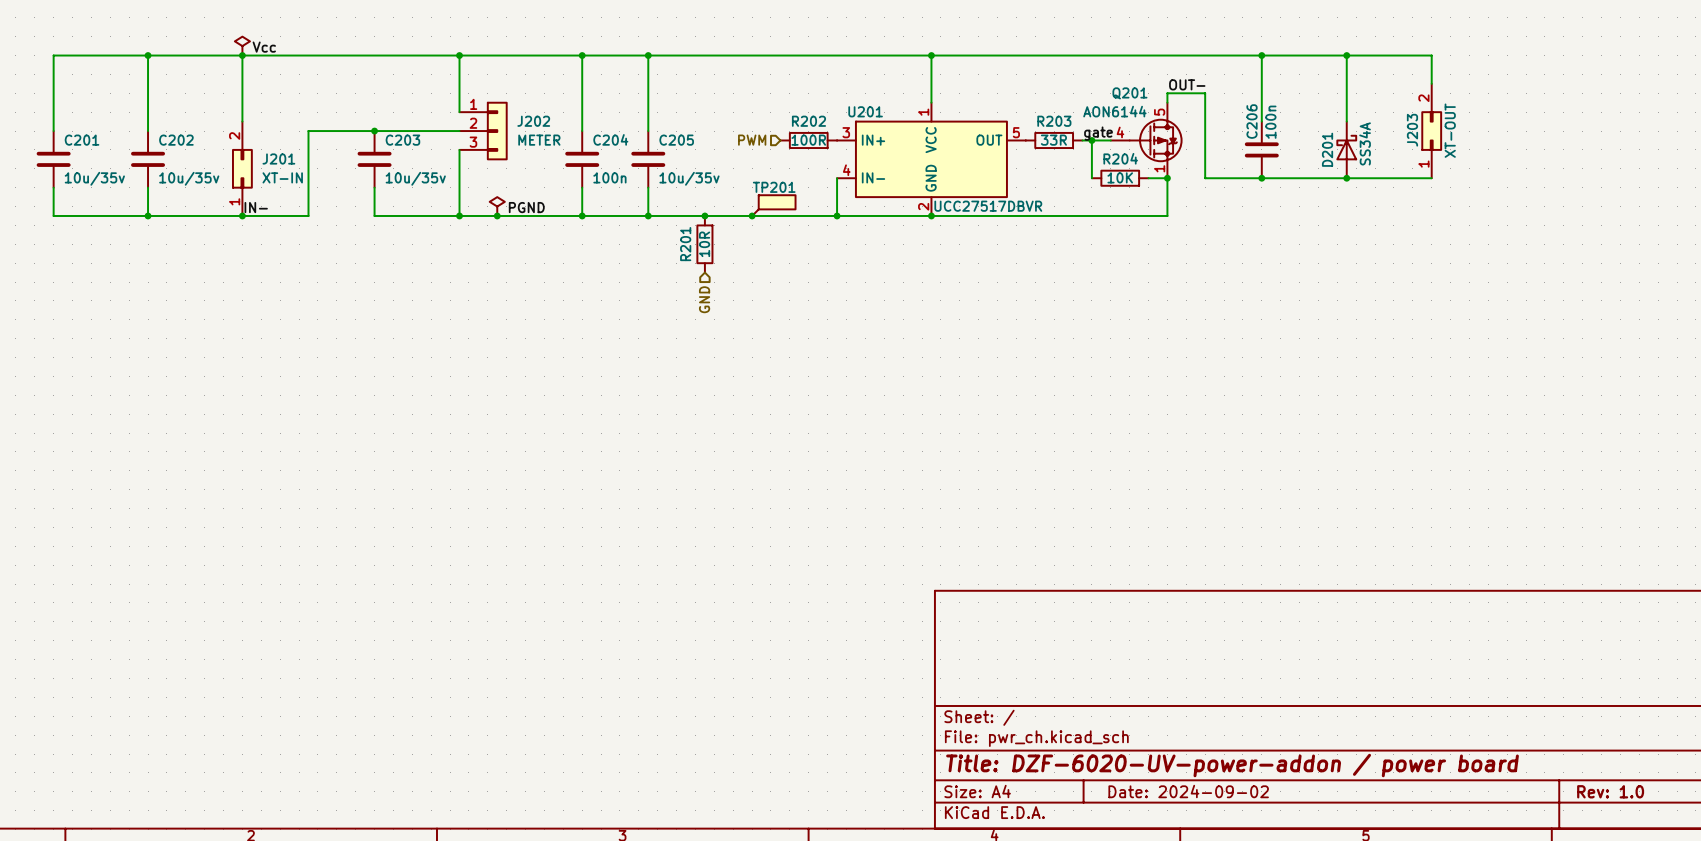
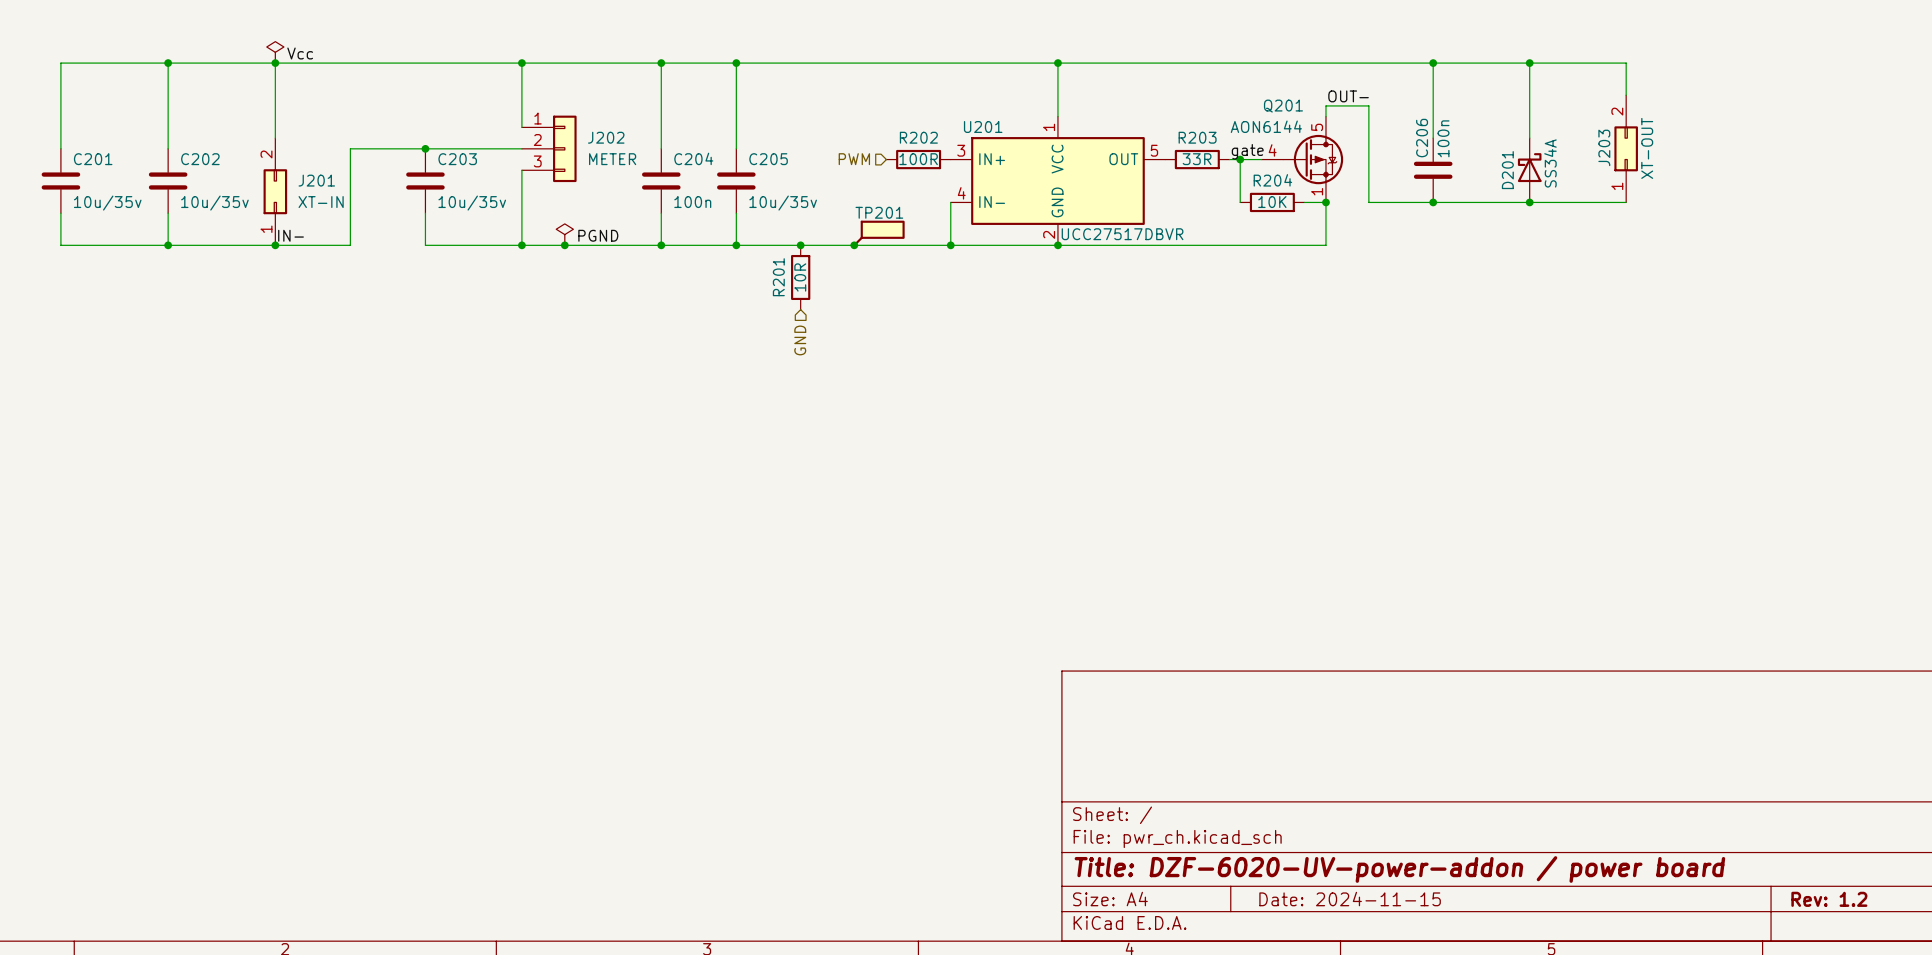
title block: Date: 2024-09-02 (1188, 791) -> Date: 2024-11-15 (1350, 899)
title block: Rev: 1.0 (1610, 791) -> Rev: 1.2 (1829, 899)

